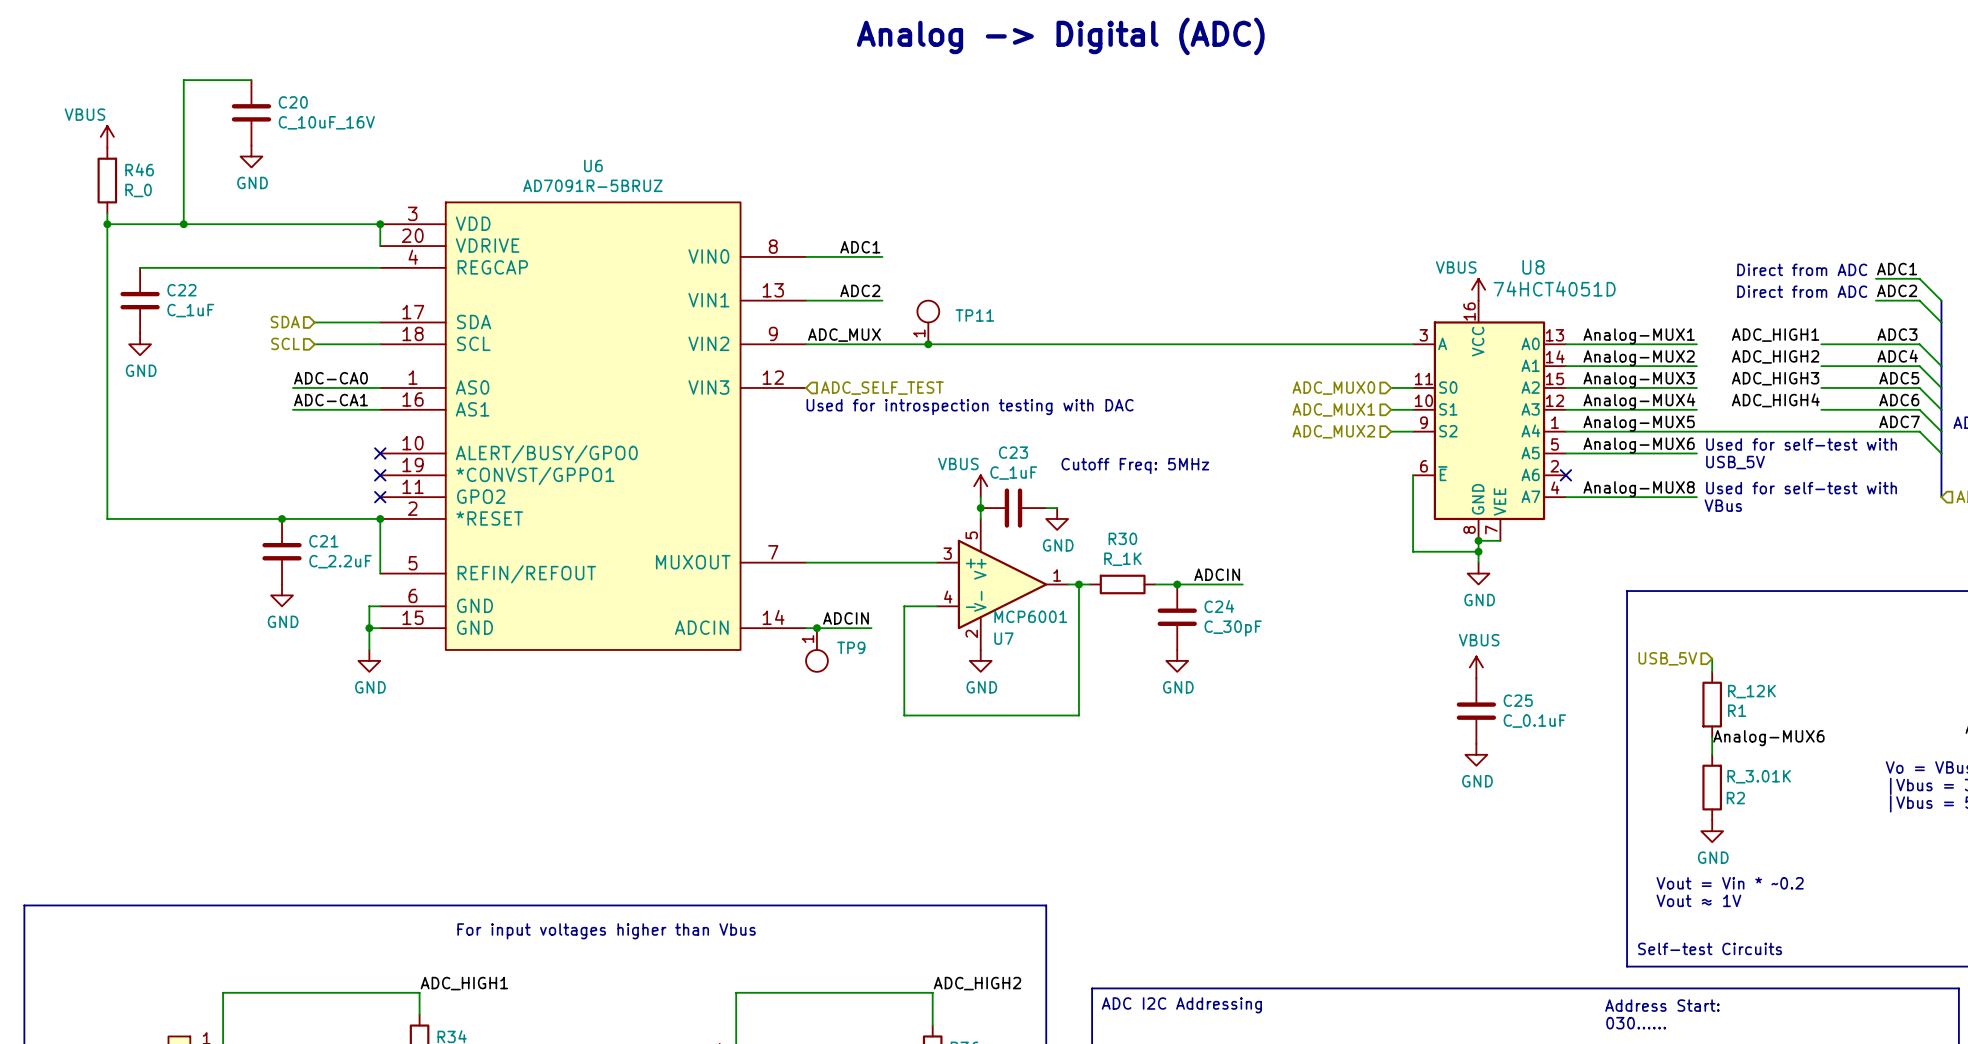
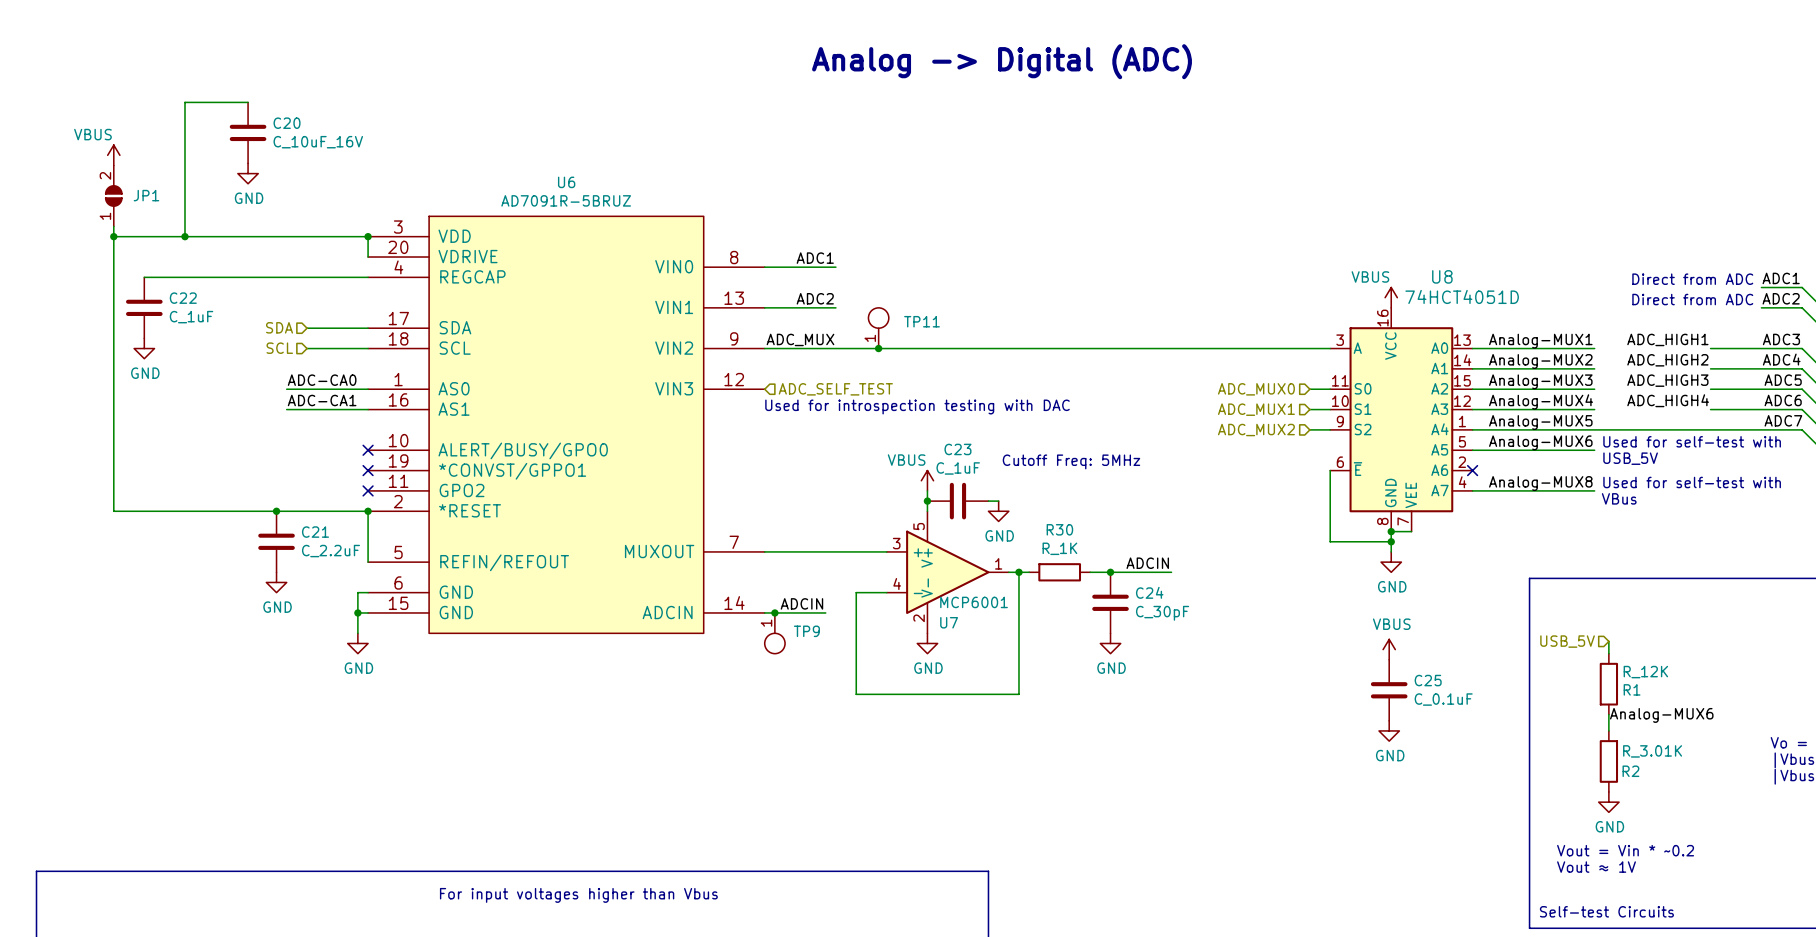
R46: R_0 (107, 180) -> none
JP1: none -> (113, 195)

